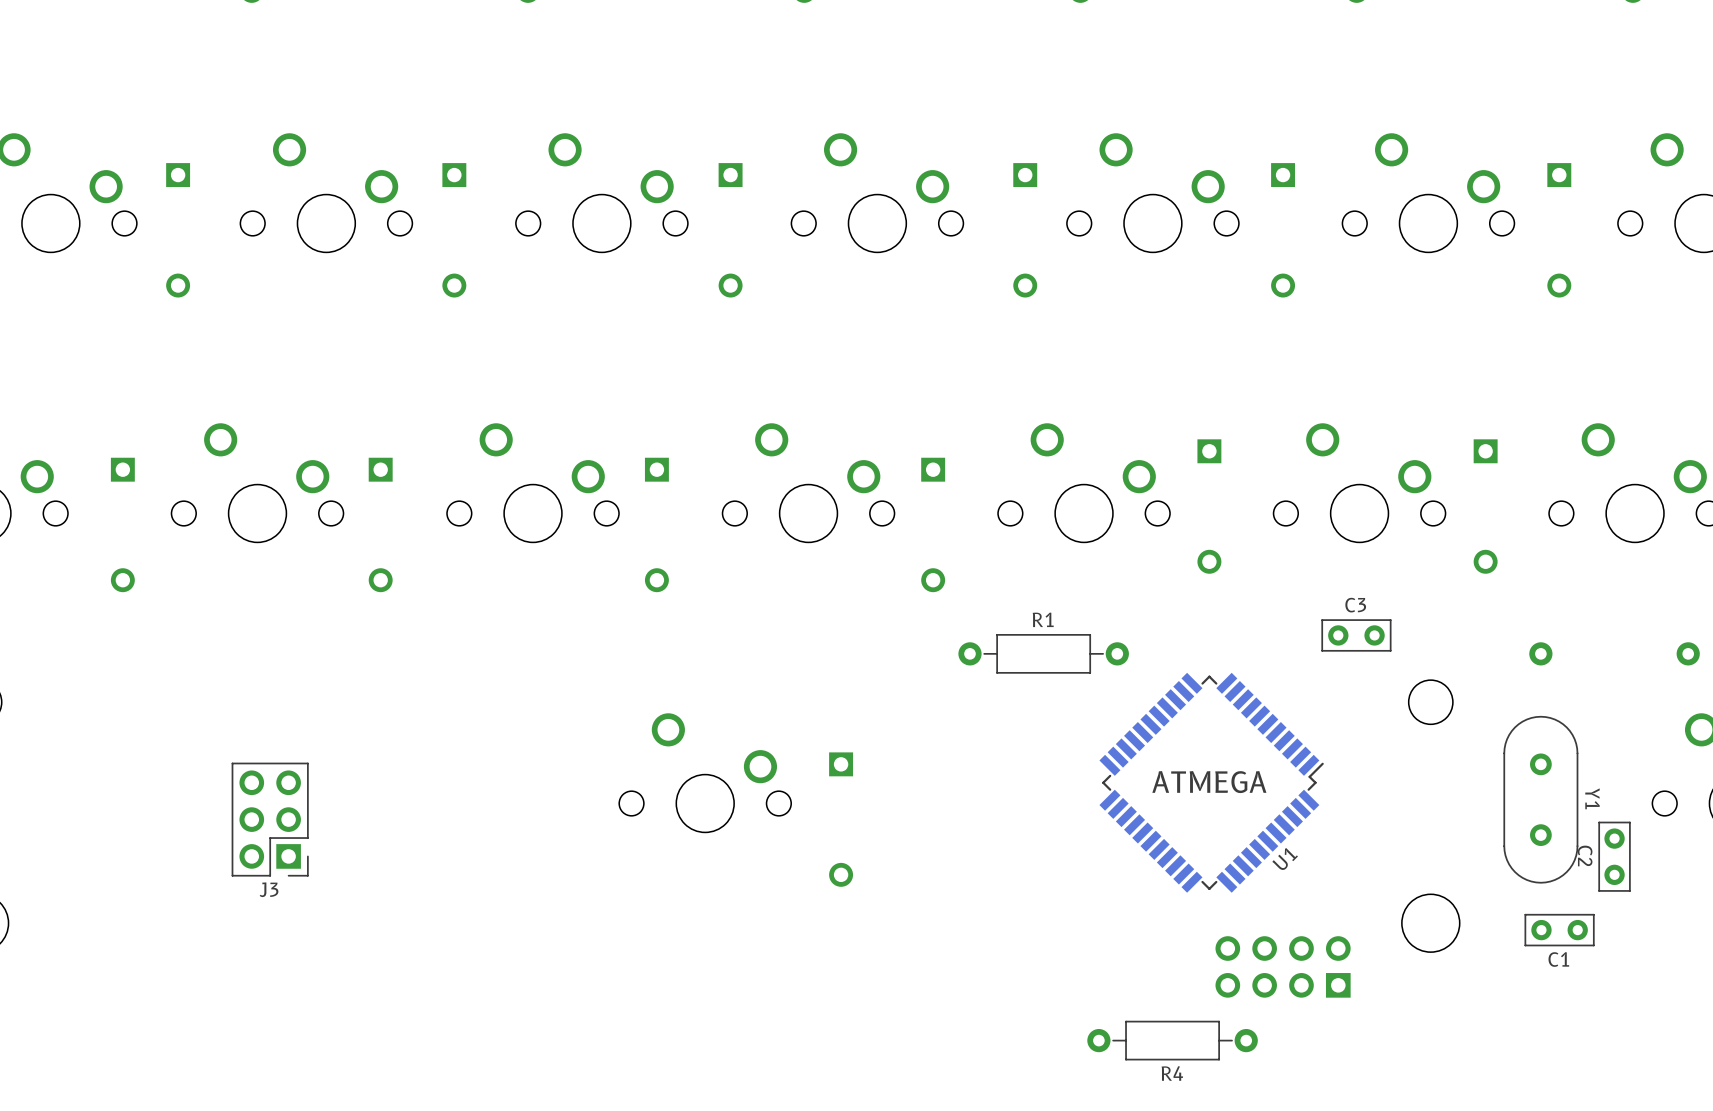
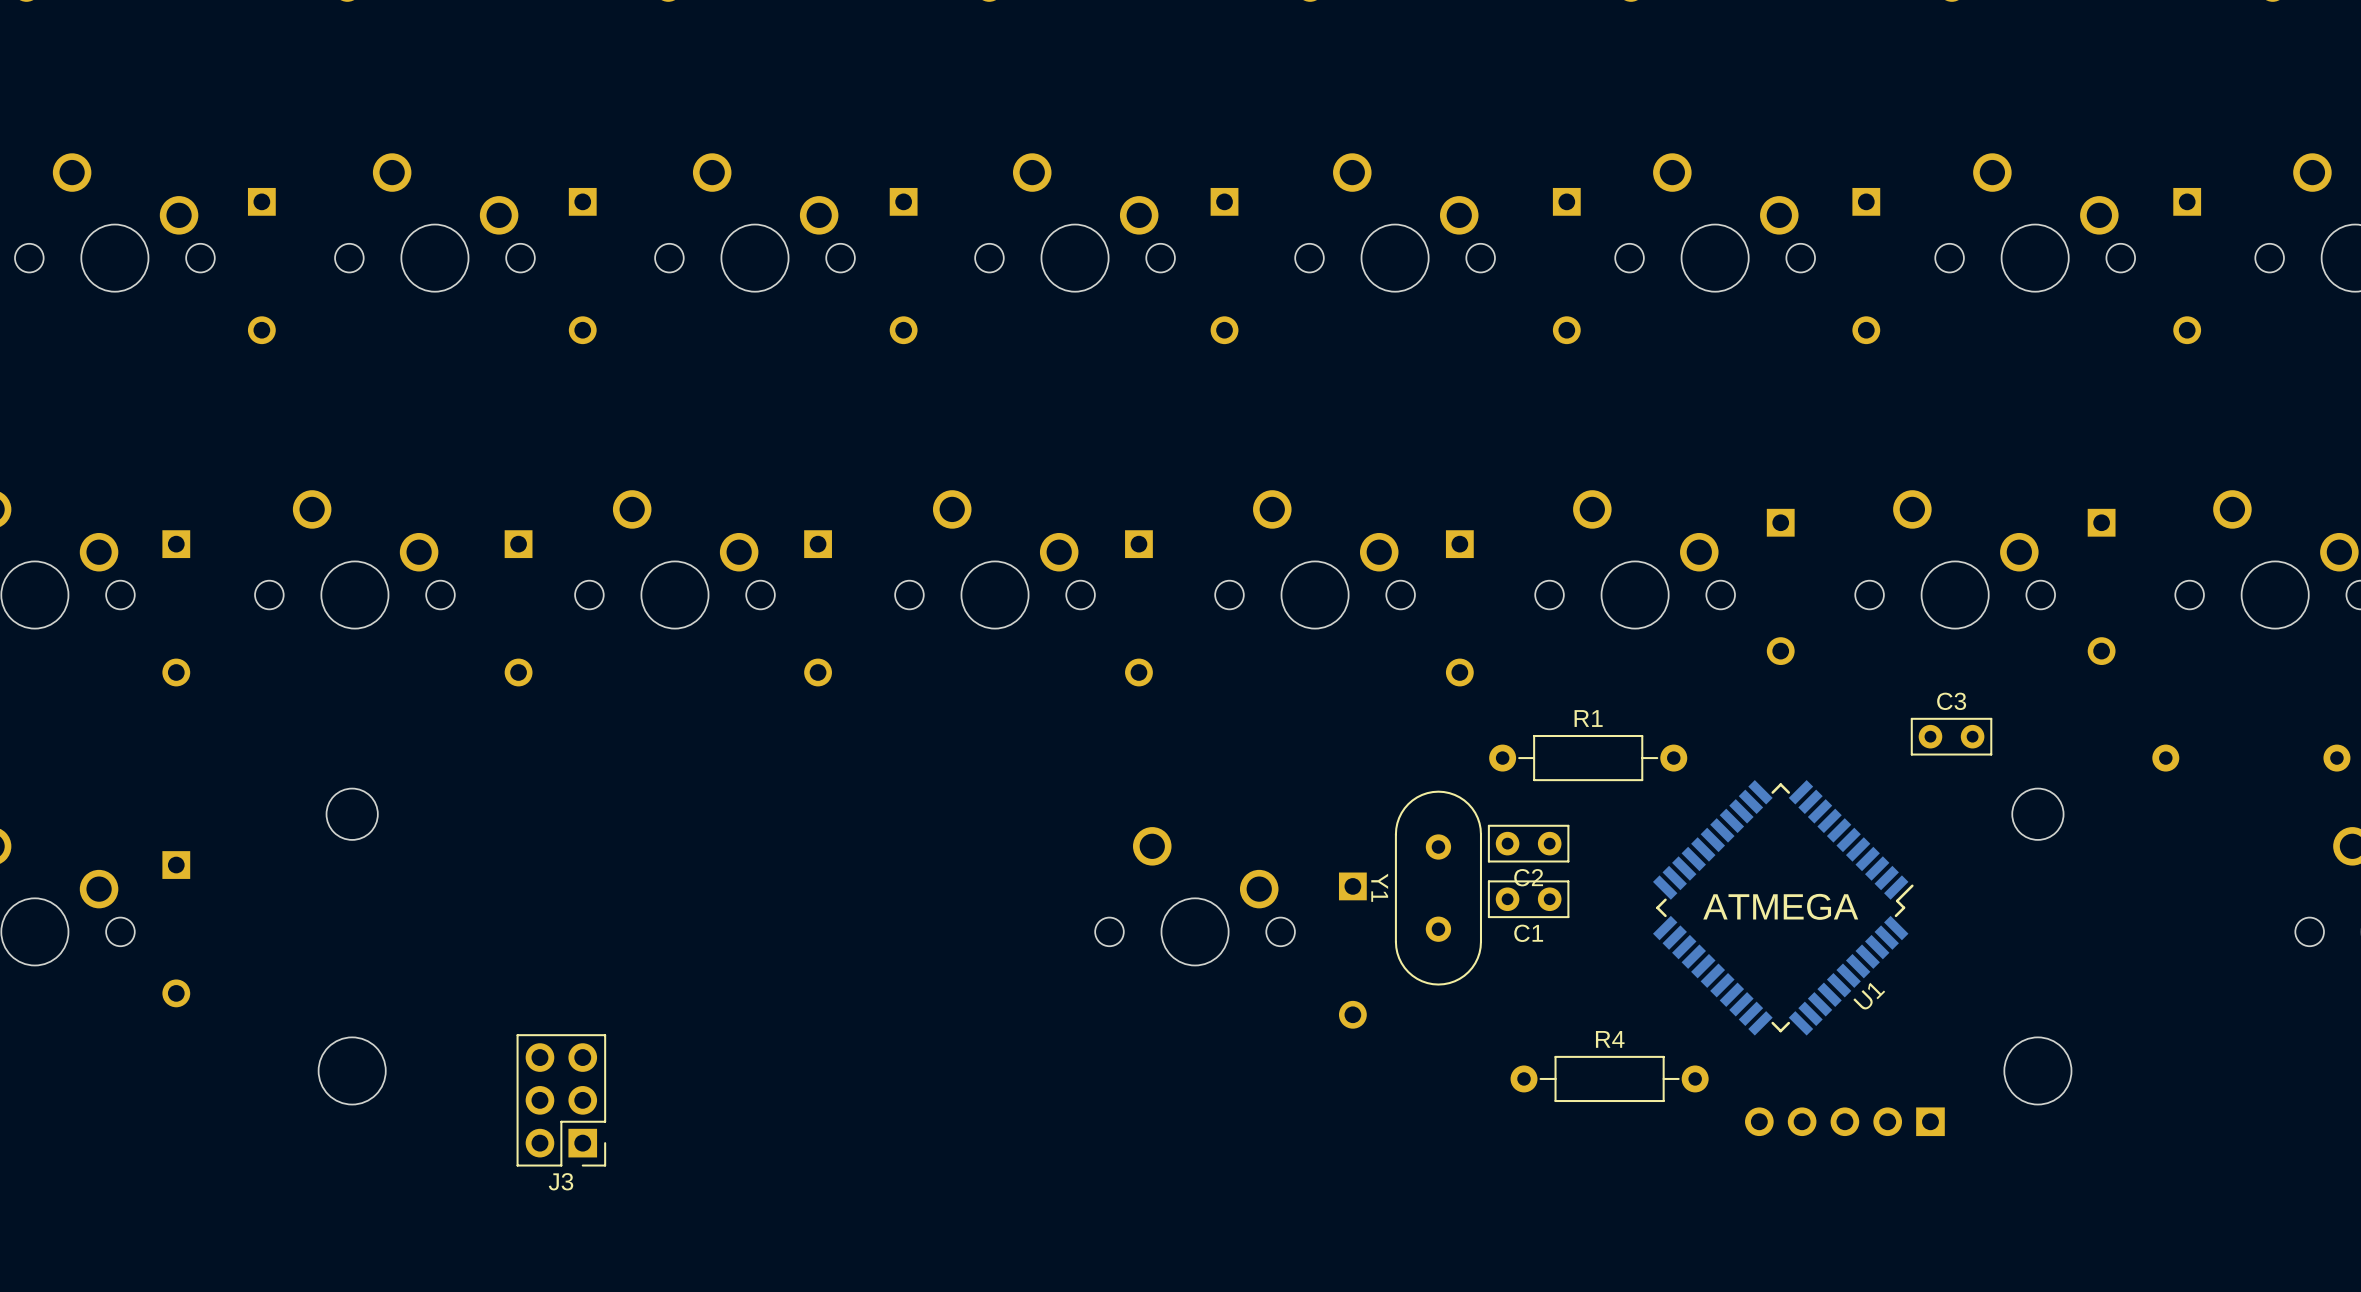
Y1 name position: Y1 (1592, 798) -> Y1 (1379, 887)
Y1 position: (1540, 799) -> (1438, 888)
J3 position: (270, 819) -> (561, 1100)
C2 name position: C2 (1585, 855) -> C2 (1528, 877)
C2 rotation: 0° (1614, 856) -> 90° clockwise (1528, 843)
C2 position: (1614, 856) -> (1528, 843)
C1 position: (1559, 930) -> (1528, 899)
part: none -> (1844, 1121)
part: (1283, 966) -> none
R4 position: (1172, 1040) -> (1609, 1078)
R4 name position: R4 (1172, 1073) -> R4 (1610, 1039)

